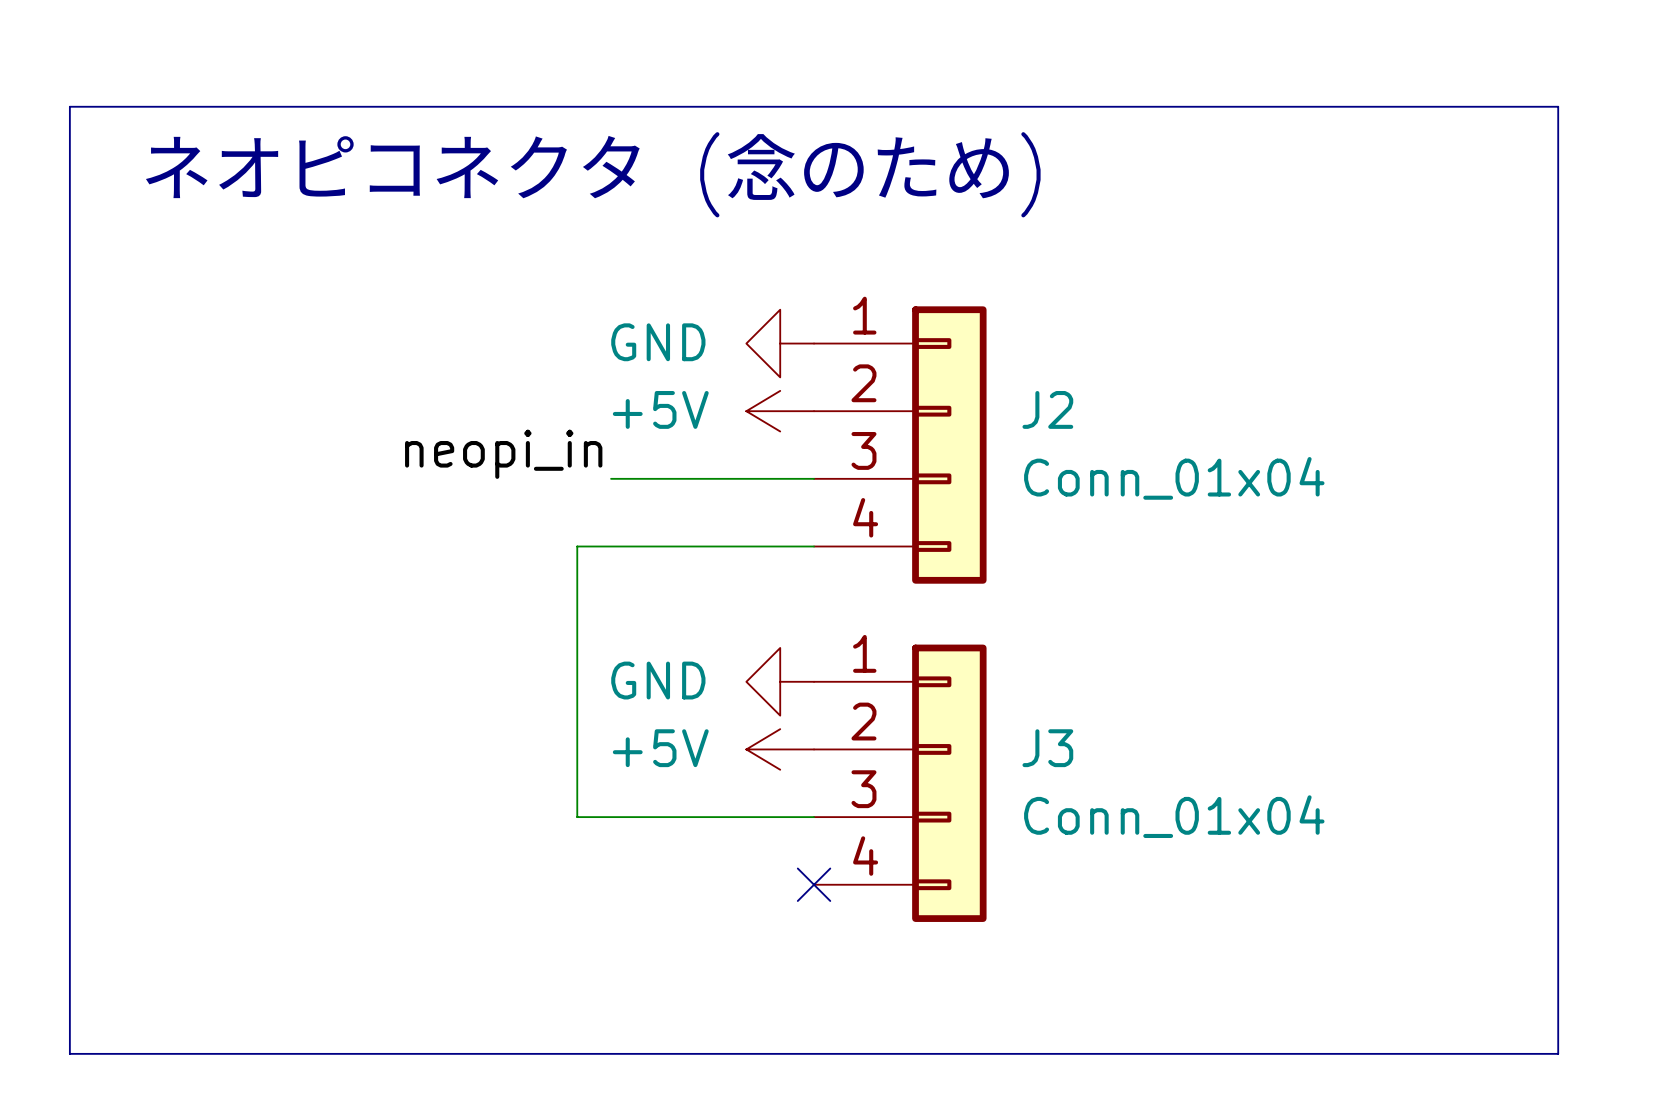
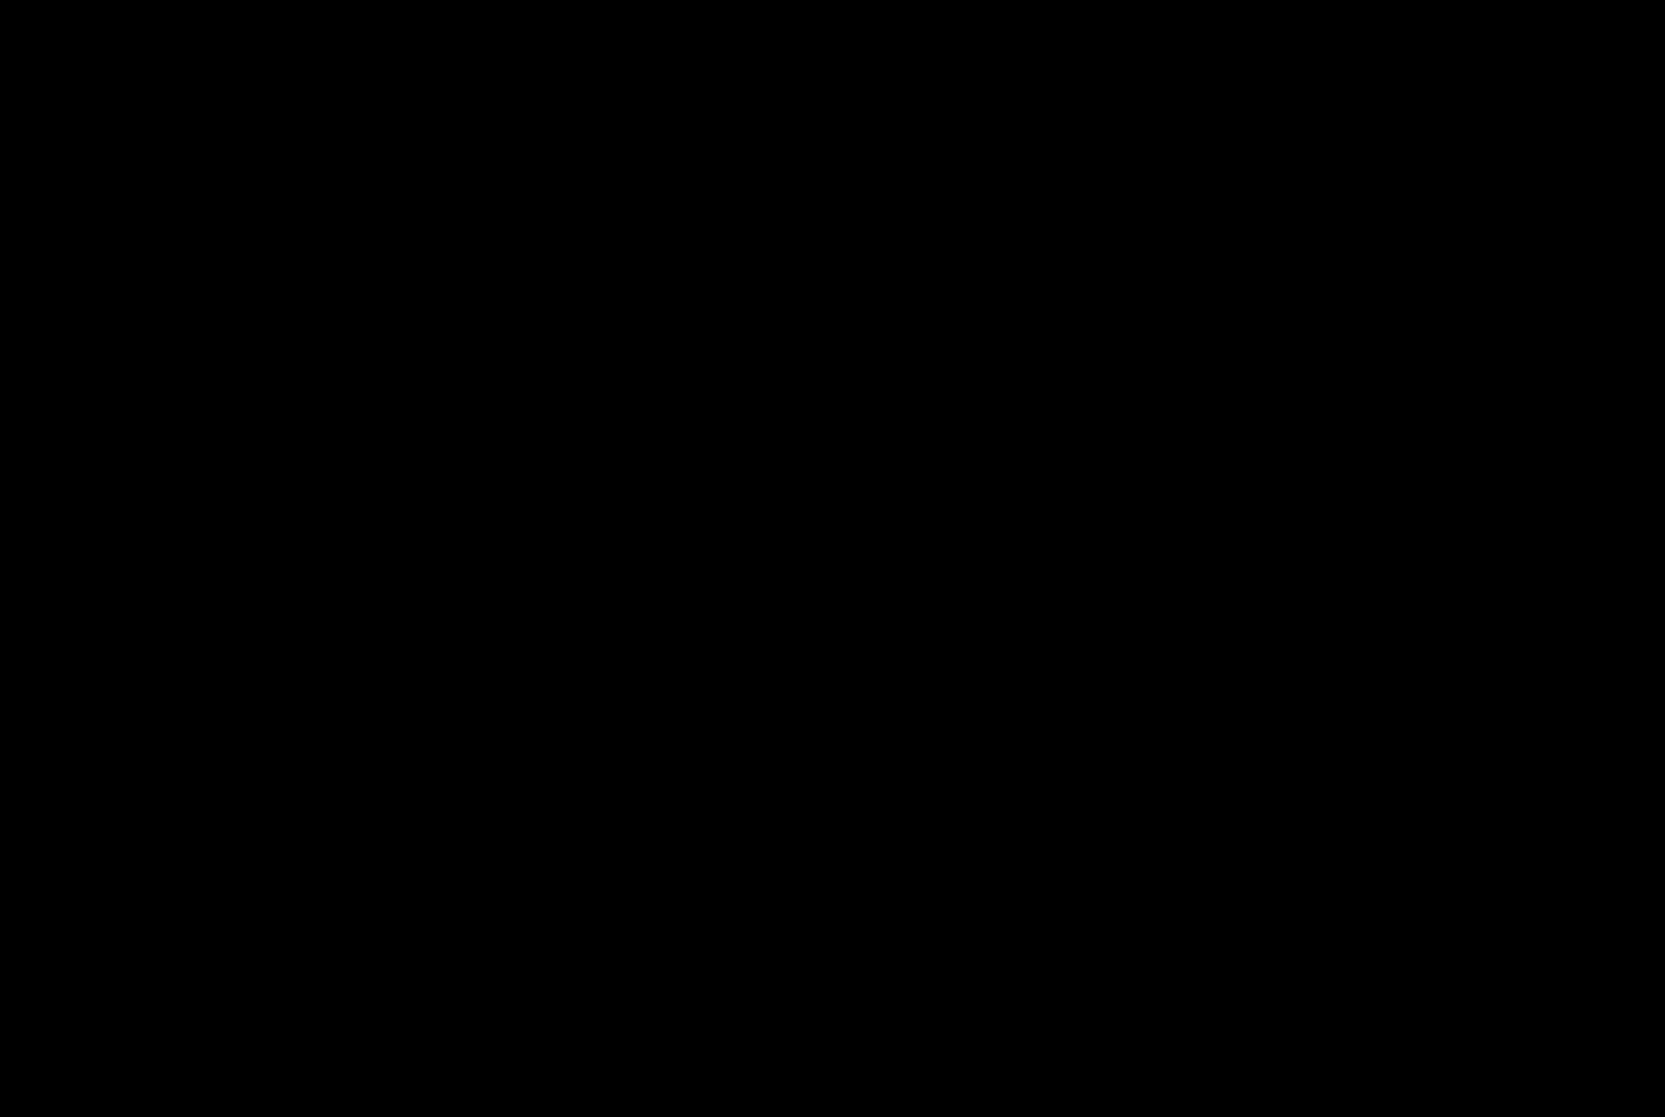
line: (69, 106) (1558, 106) (1558, 1053) (69, 1053) (69, 106) -> none
text: ネオピコネクタ (念のため) (592, 174) -> none
power symbol: GND (780, 343) -> none
power symbol: +5V (780, 411) -> none
J2: Conn_01x04 (900, 445) -> none
label: neopi_in (503, 454) -> none
wire: (611, 478) (814, 478) -> none
wire: (814, 546) (577, 546) (577, 817) (814, 817) -> none
power symbol: GND (780, 681) -> none
power symbol: +5V (780, 749) -> none
J3: Conn_01x04 (900, 783) -> none
no-connect mark: (814, 884) -> none

